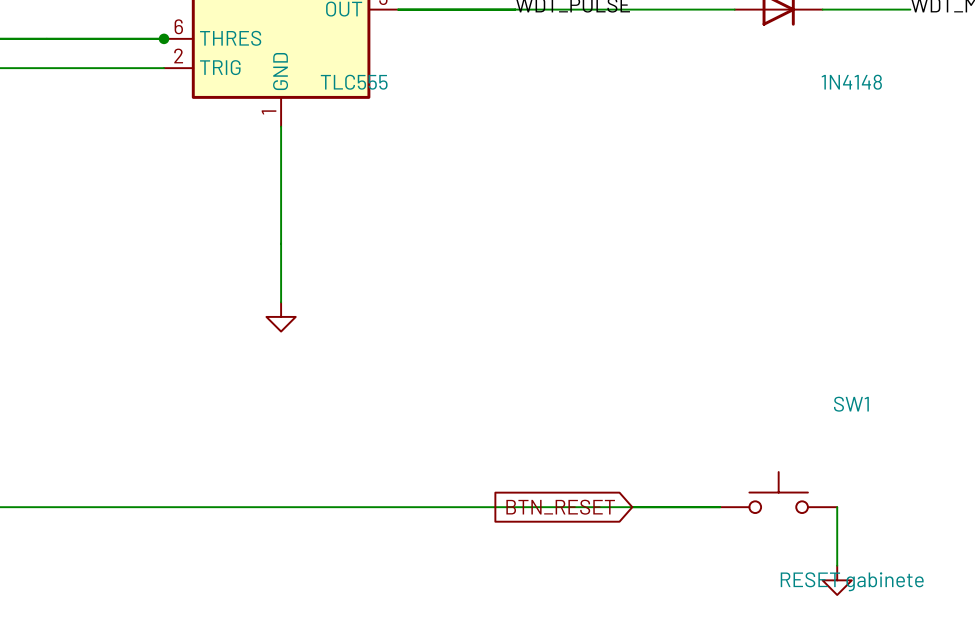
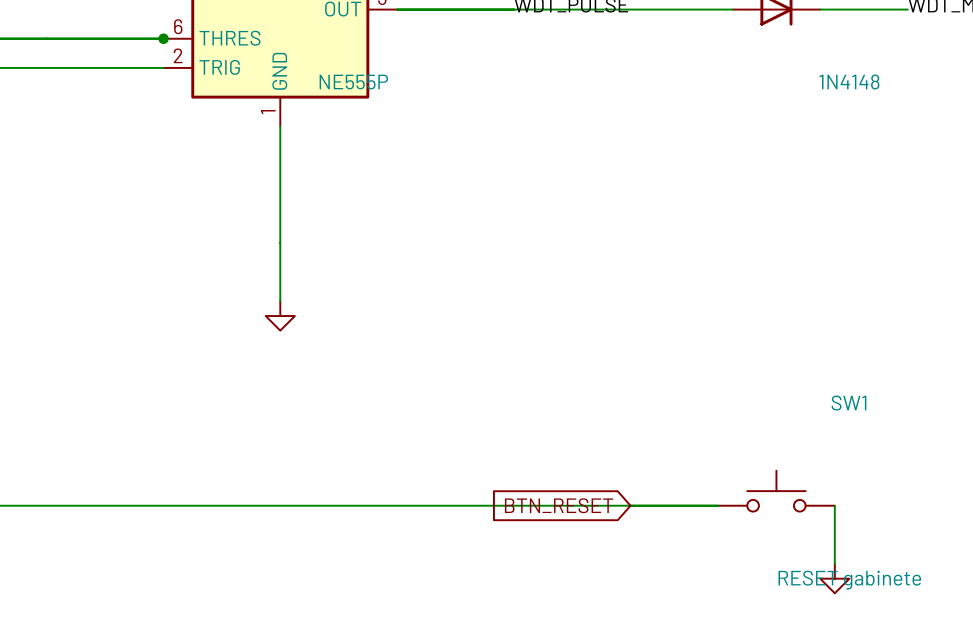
part value: TLC555 (354, 82) -> NE555P (353, 82)

